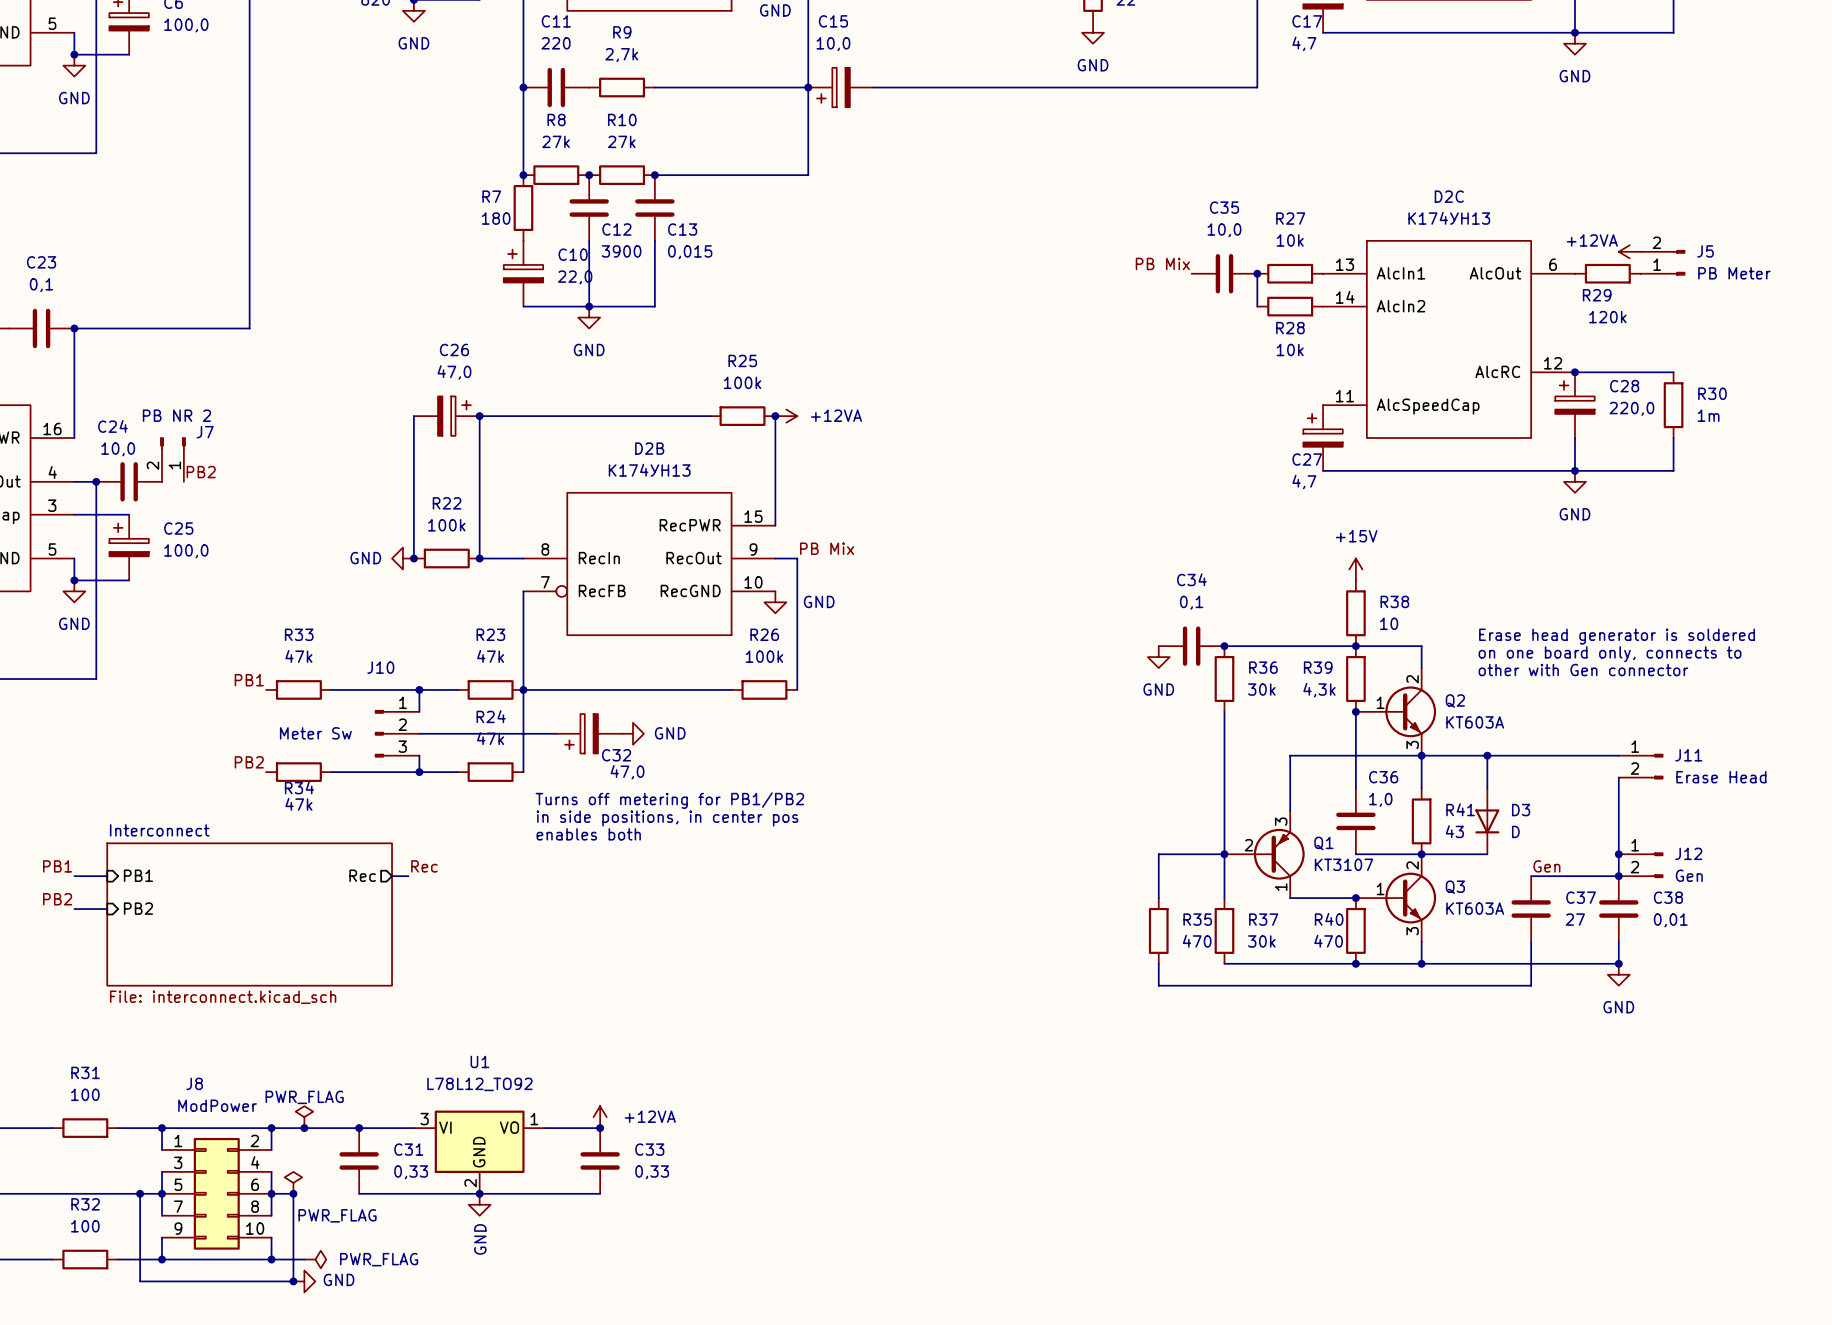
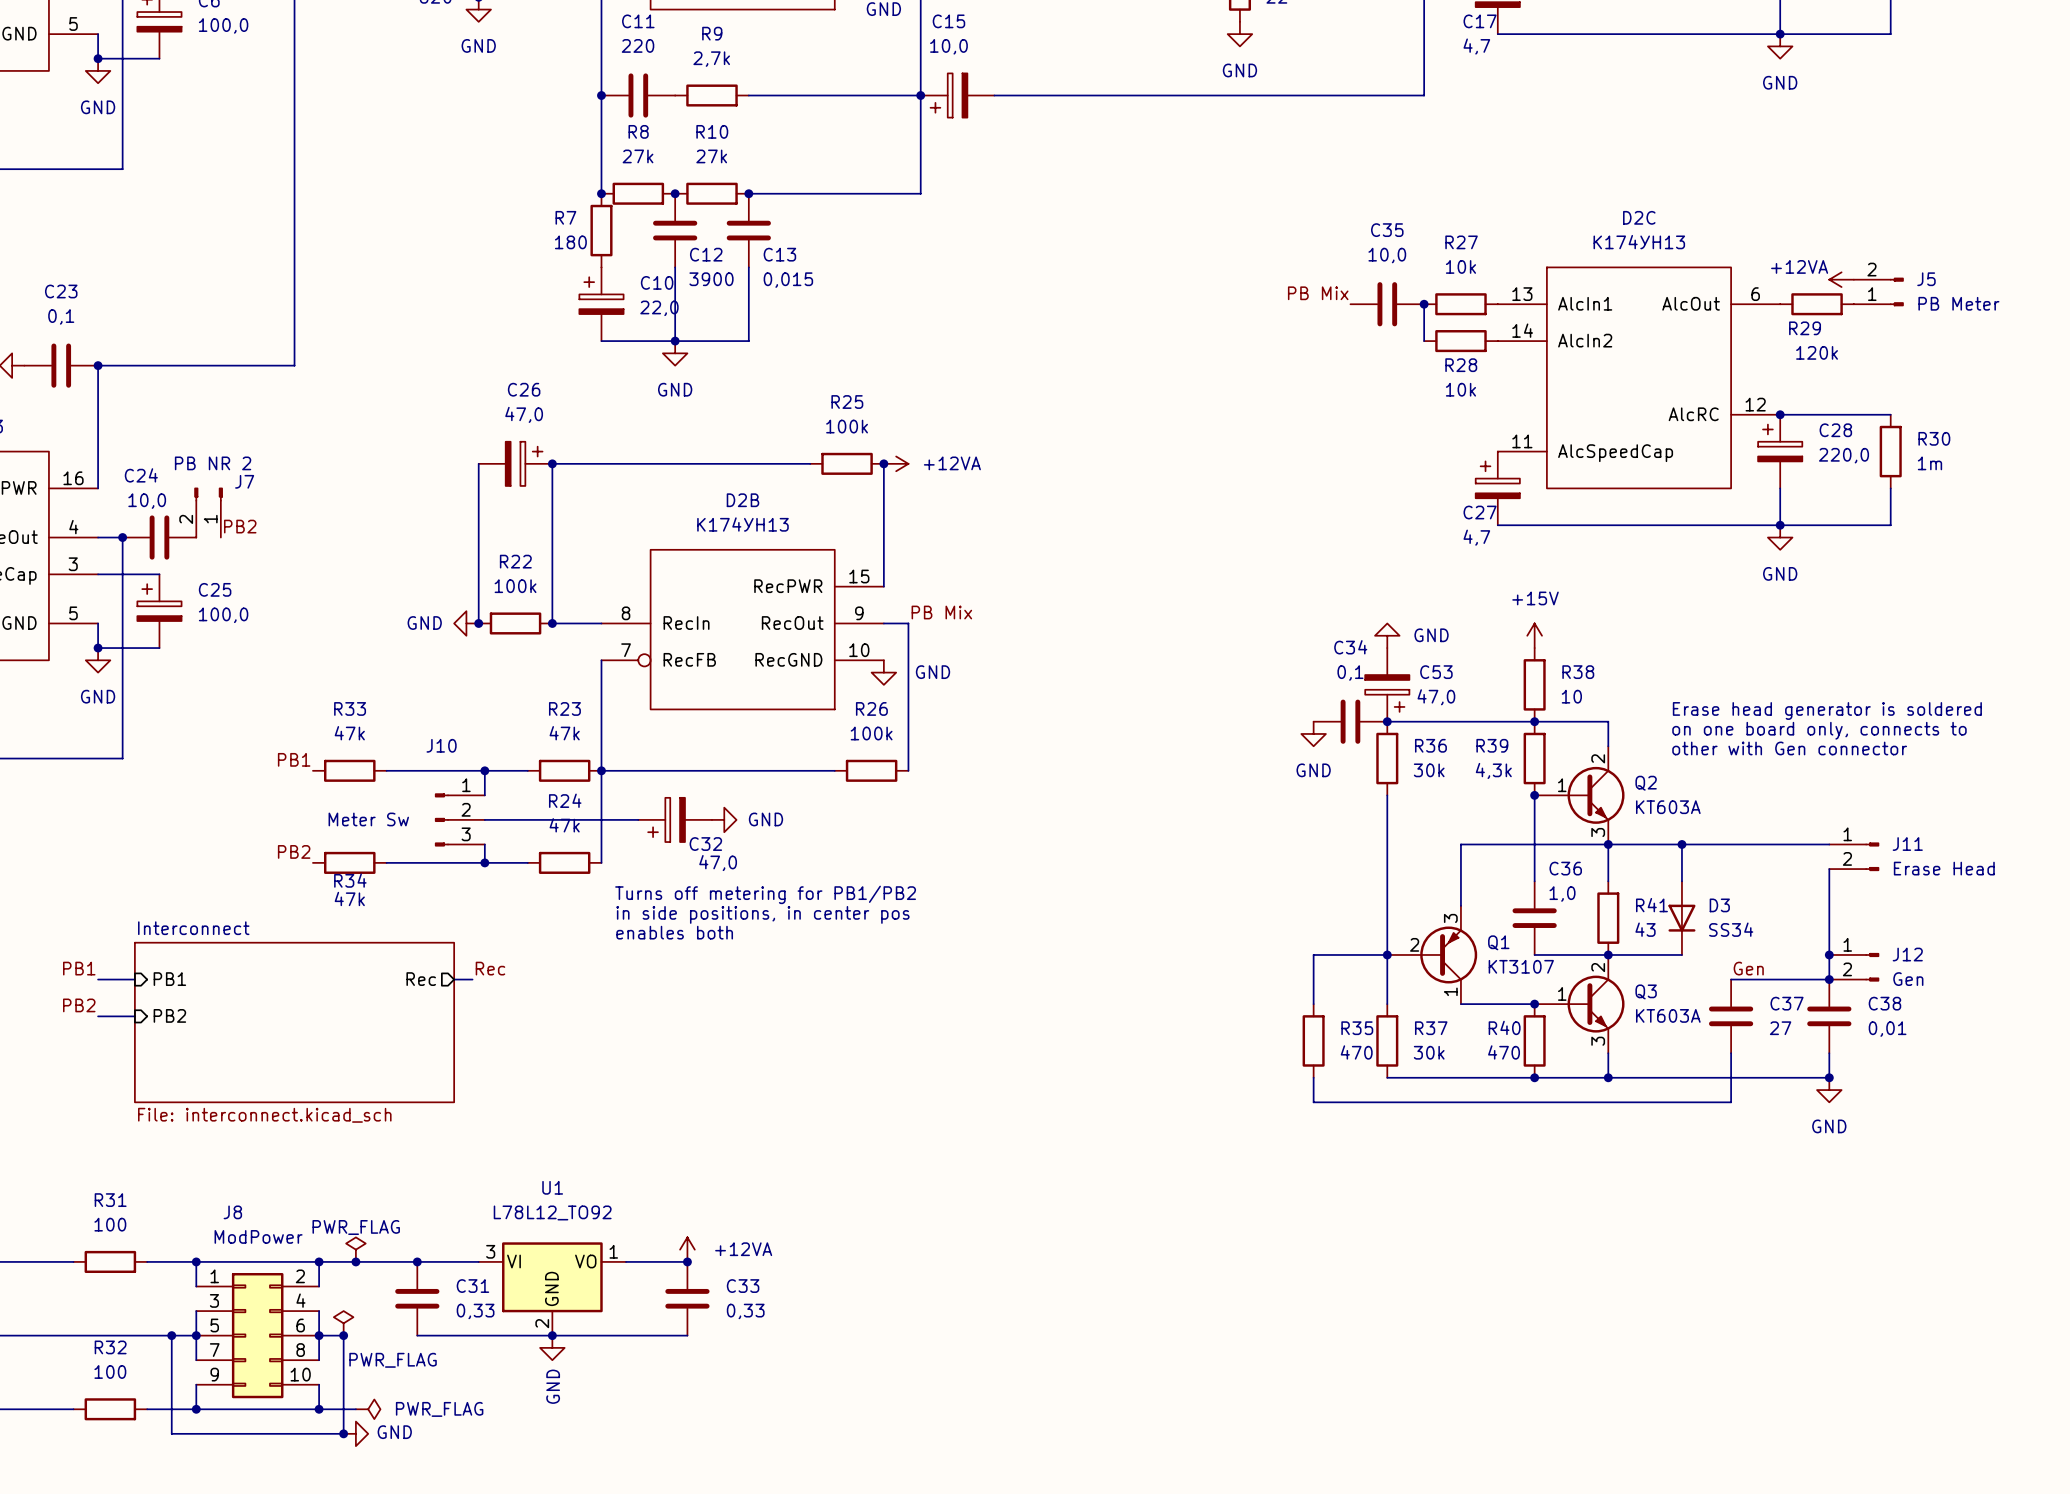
power symbol: none -> GND (1387, 635)
C53: none -> 47,0 (1387, 684)
D3 value: D (1515, 831) -> SS34 (1731, 929)

